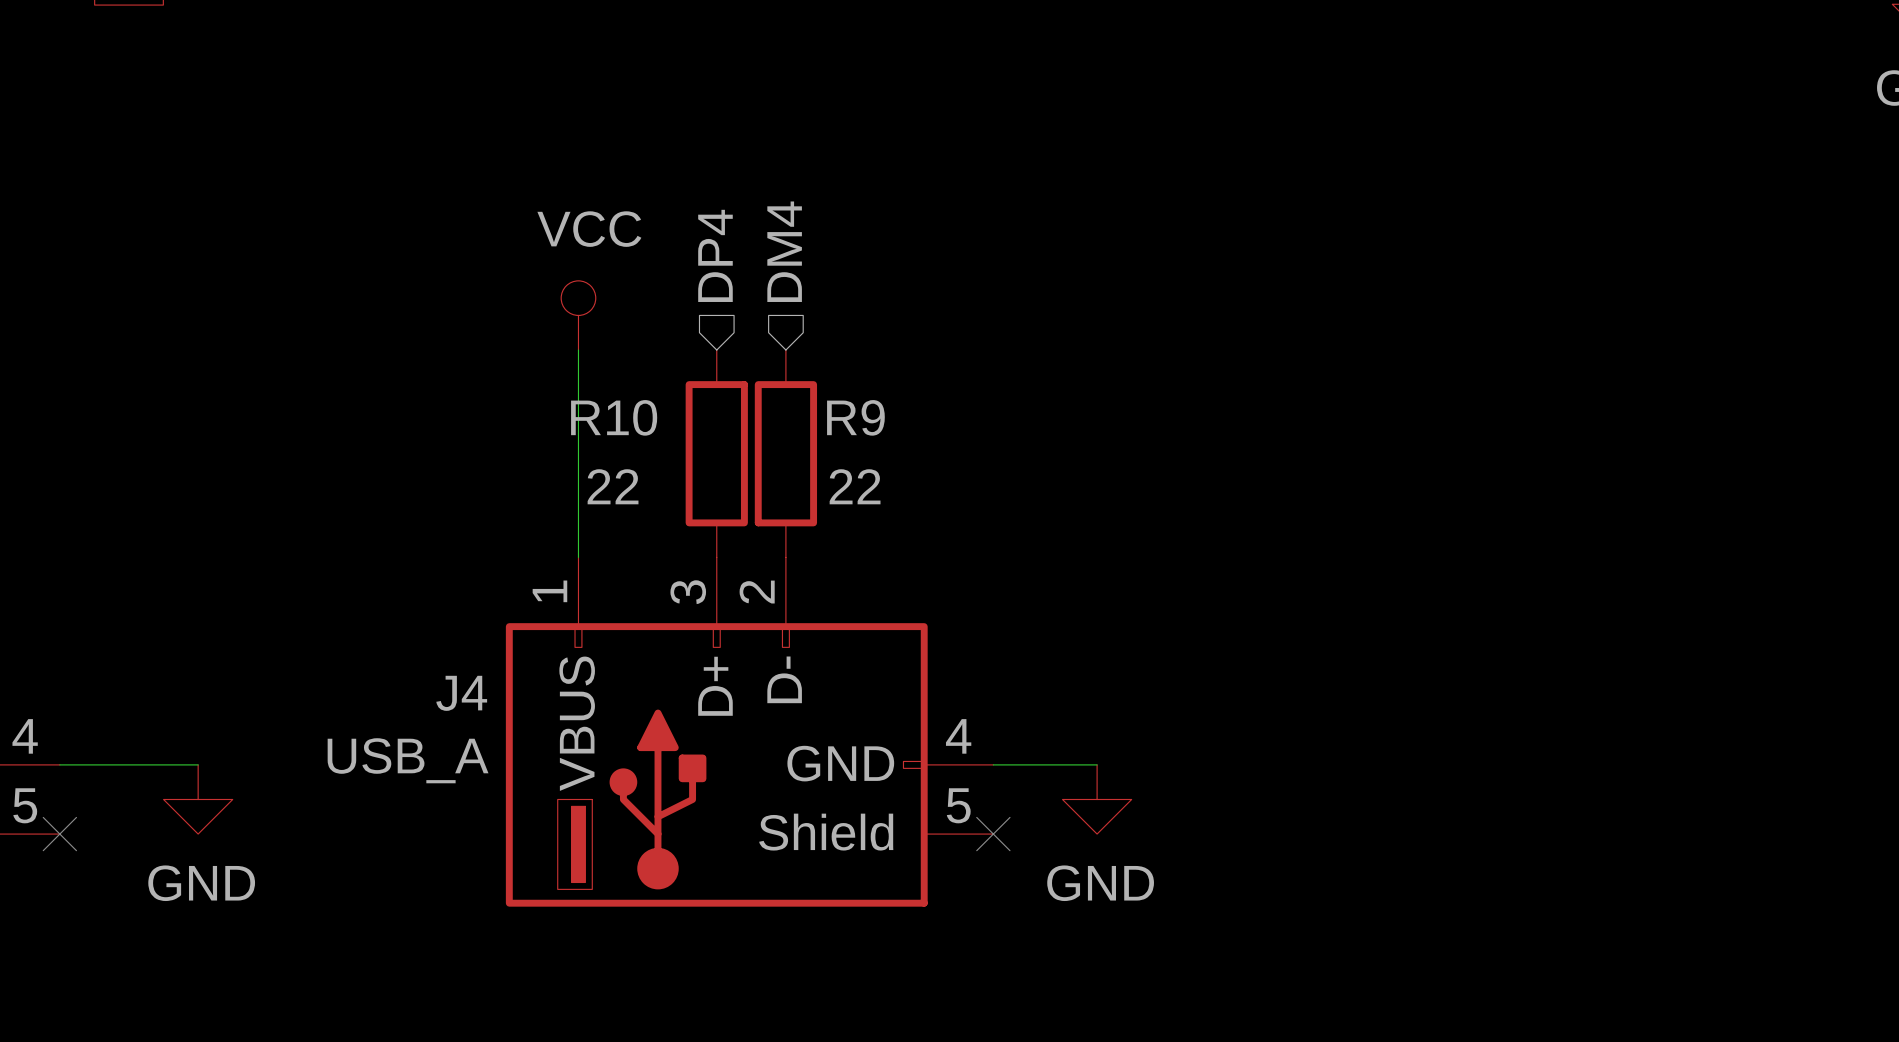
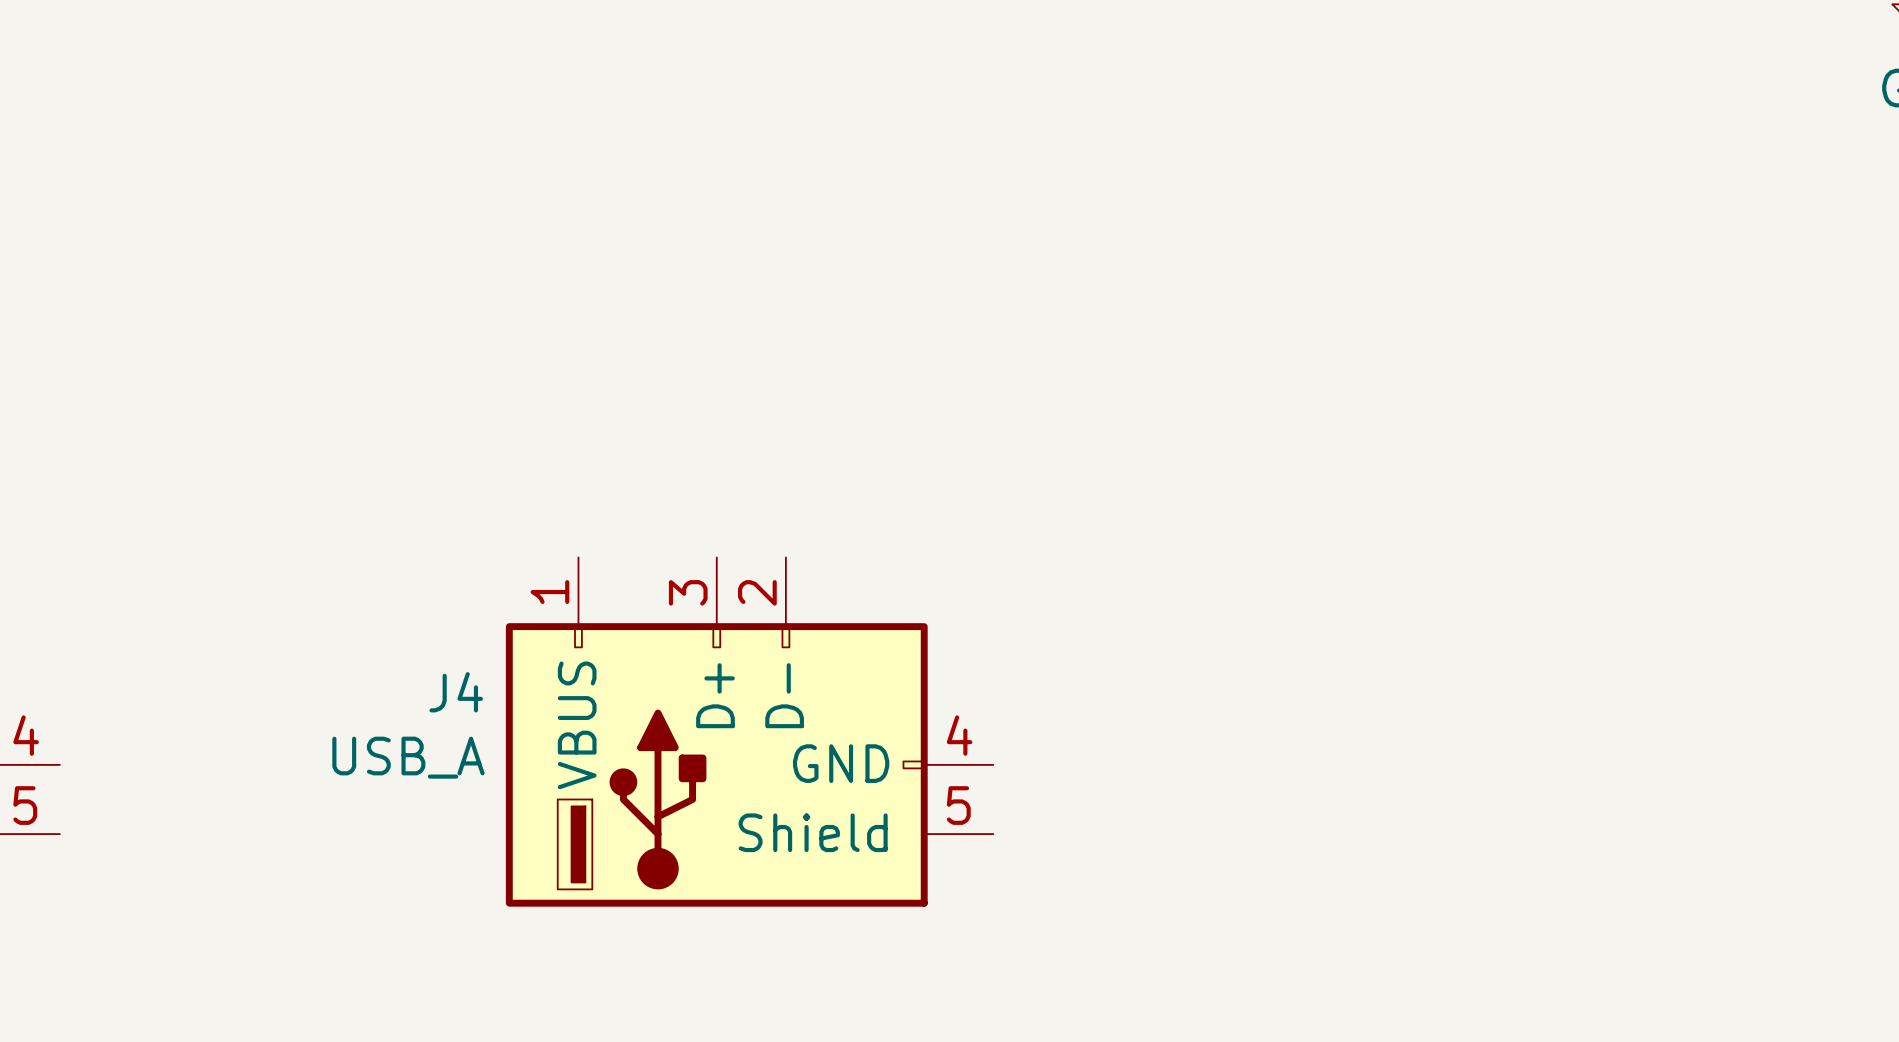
hierarchical label: DM4 (784, 251) -> none
hierarchical label: DP4 (715, 255) -> none
power symbol: VCC (578, 315) -> none
wire: (578, 350) (578, 557) -> none
R10: 22 (716, 453) -> none
R9: 22 (785, 453) -> none
wire: (59, 764) (198, 764) -> none
wire: (993, 764) (1097, 764) -> none
power symbol: GND (198, 799) -> none
power symbol: GND (1097, 799) -> none
no-connect mark: (59, 834) -> none
no-connect mark: (993, 834) -> none

